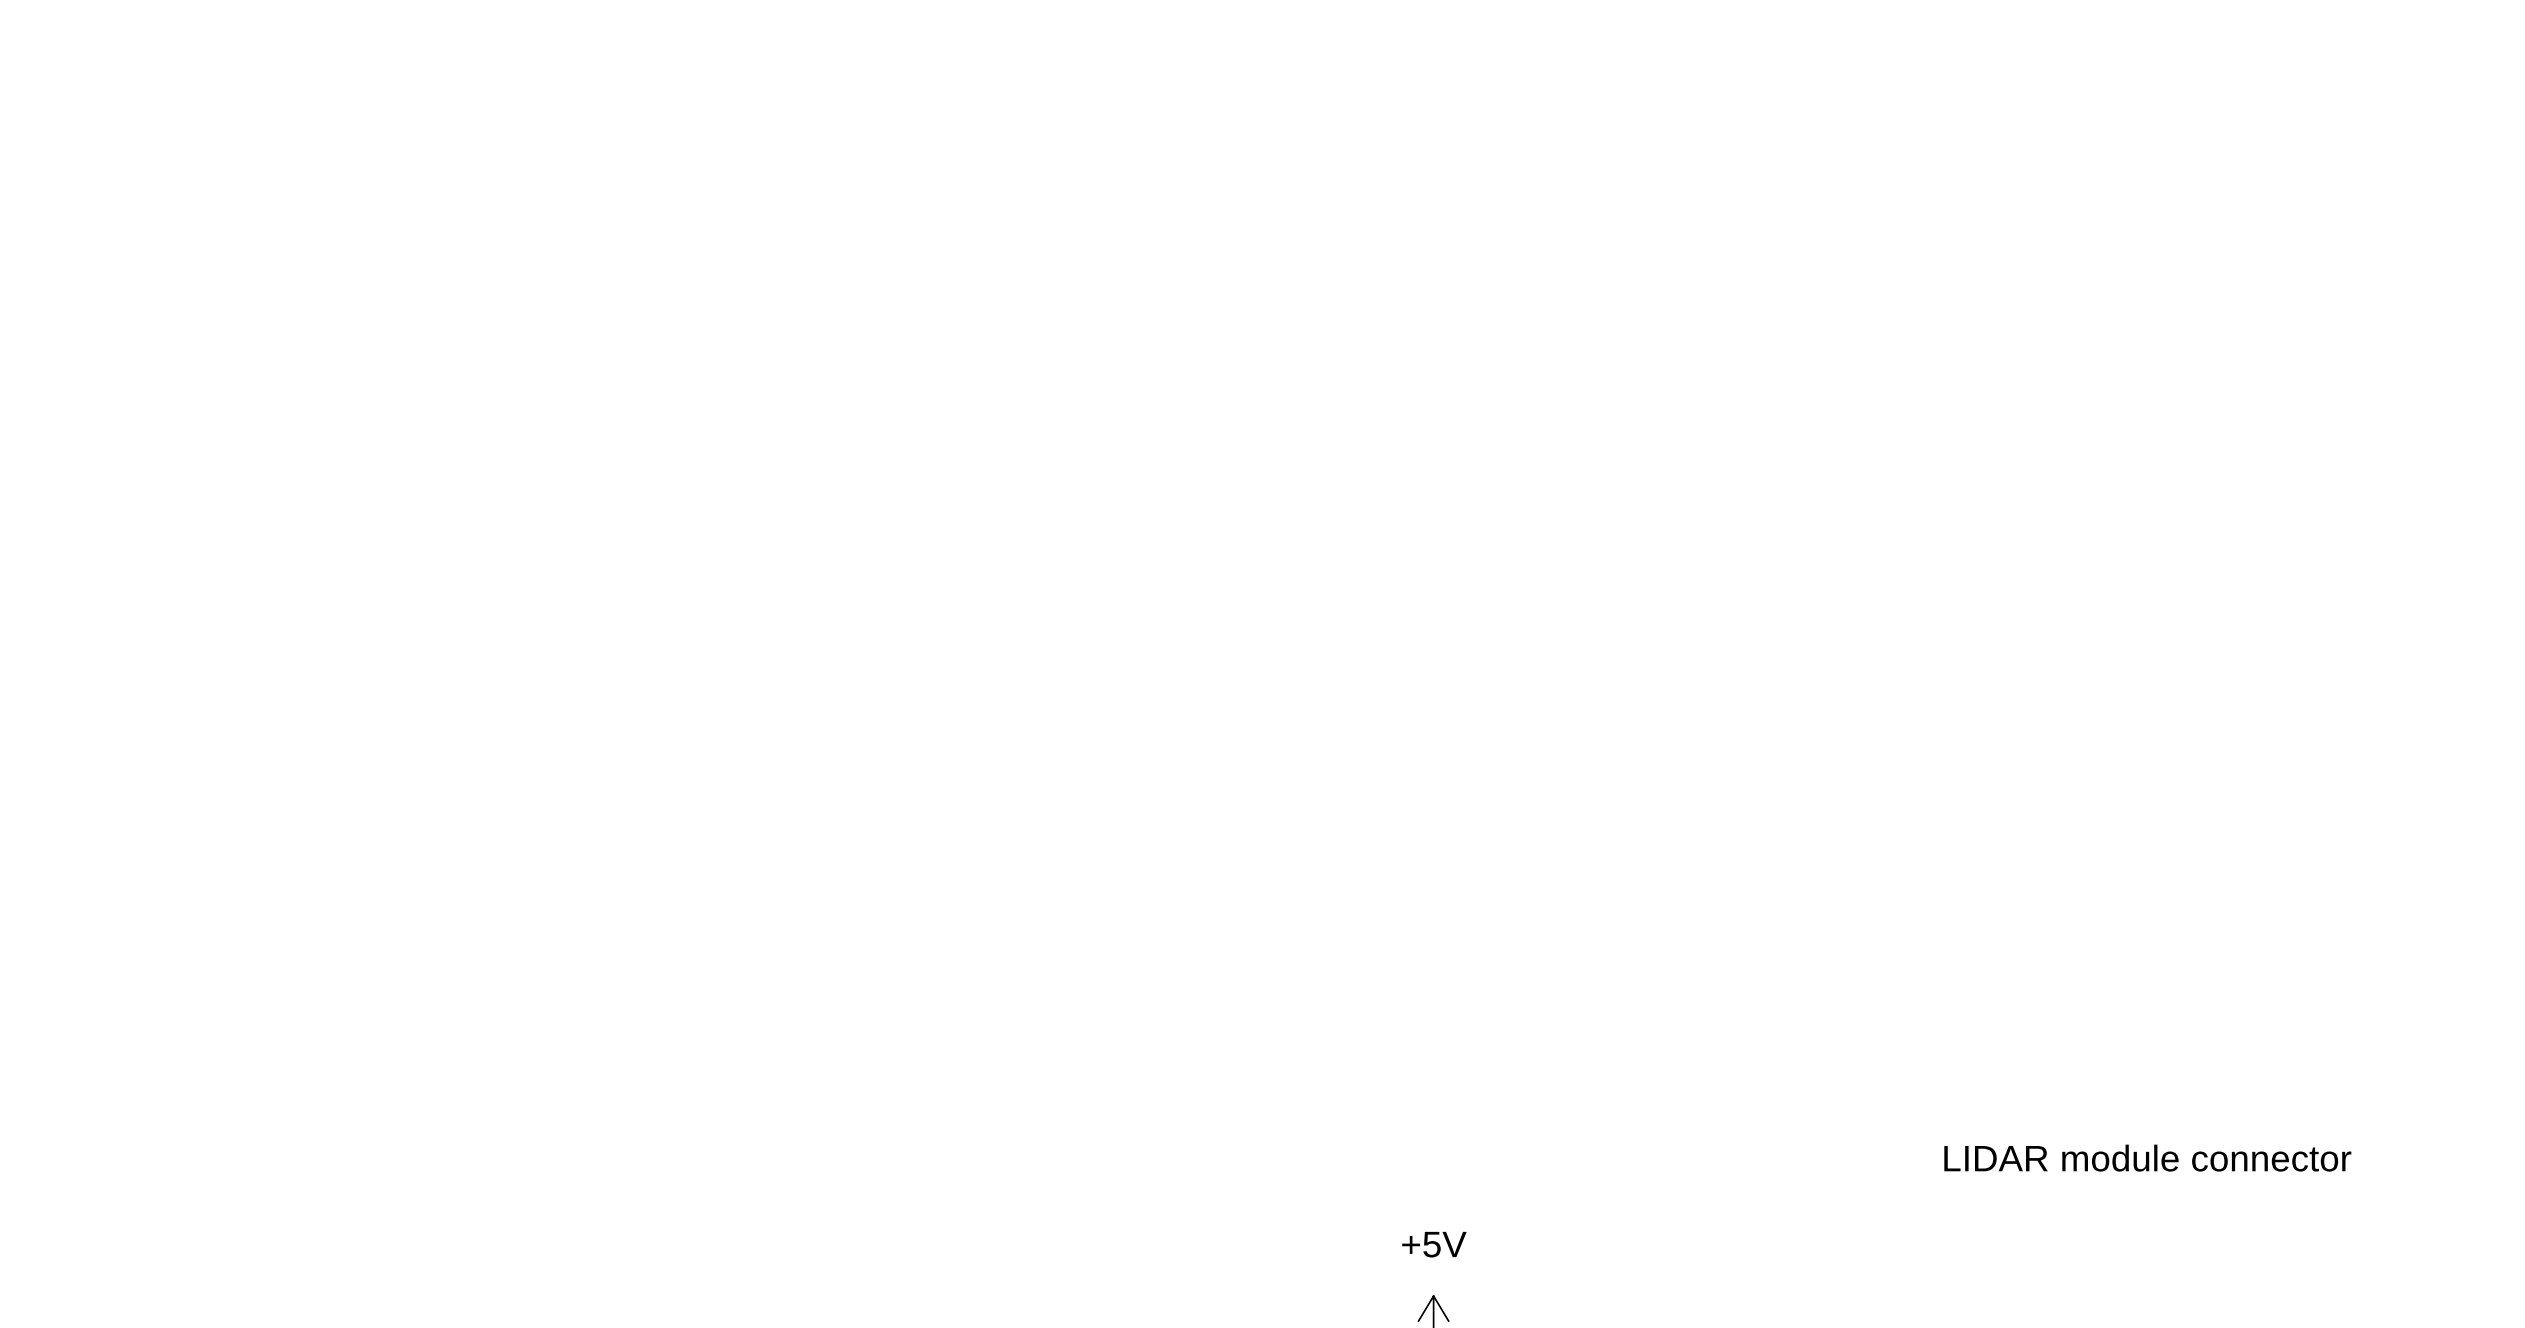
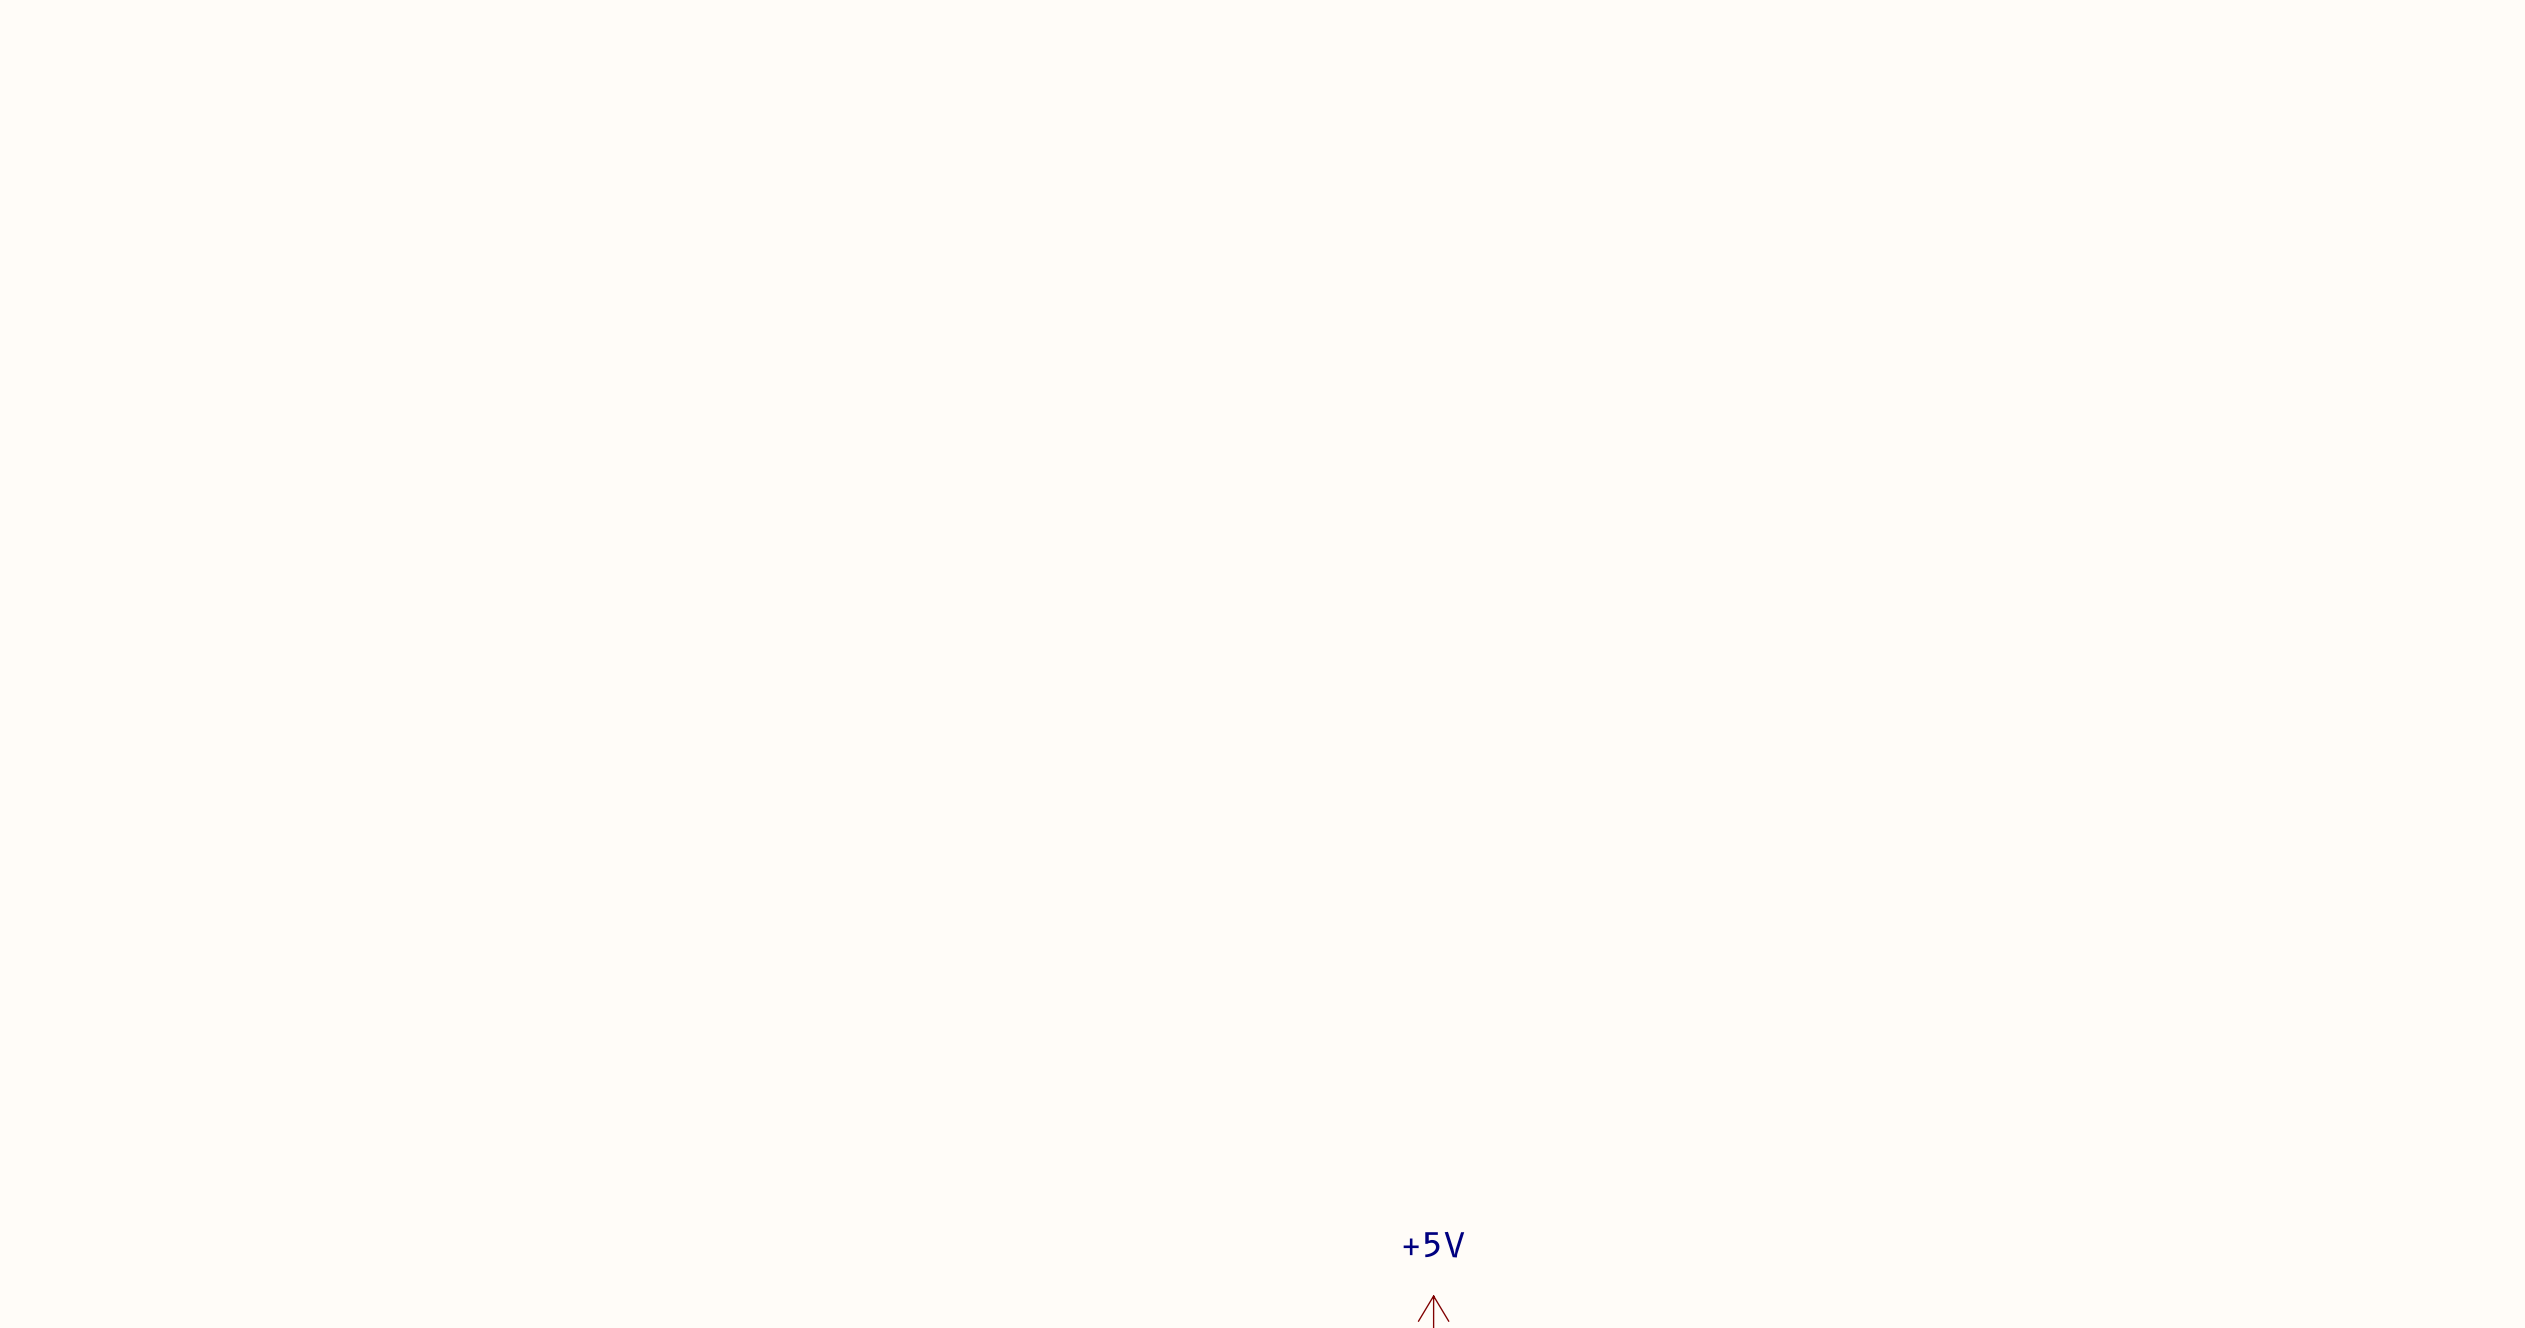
text: LIDAR module connector (2147, 1158) -> none

